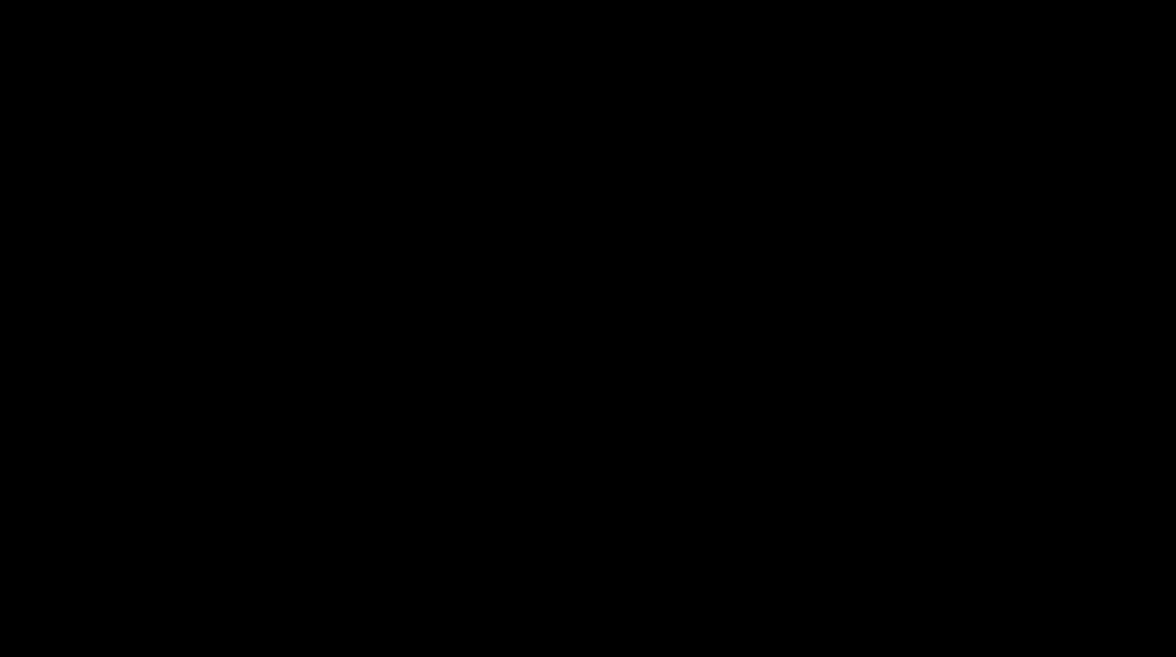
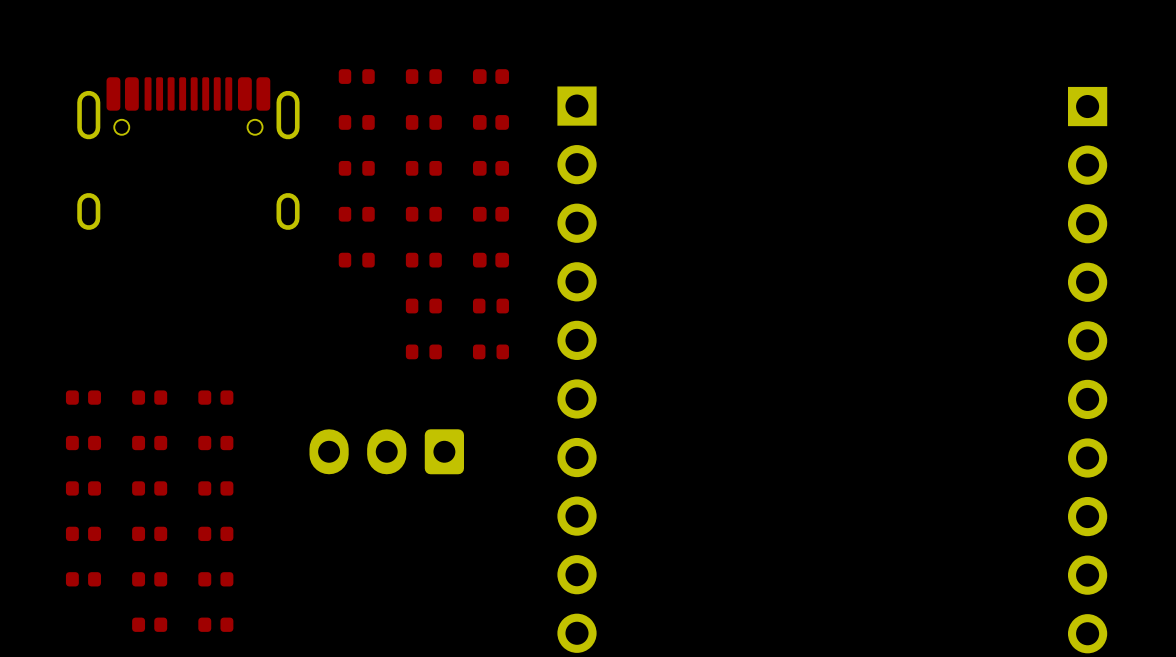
part: none -> (356, 76)
part: none -> (423, 76)
part: none -> (490, 76)
part: none -> (356, 122)
part: none -> (423, 122)
part: none -> (490, 122)
part: none -> (188, 153)
part: none -> (356, 168)
part: none -> (423, 168)
part: none -> (490, 168)
part: none -> (356, 214)
part: none -> (423, 214)
part: none -> (490, 214)
part: none -> (356, 260)
part: none -> (423, 260)
part: none -> (490, 260)
part: none -> (423, 306)
part: none -> (490, 306)
part: none -> (423, 351)
part: none -> (490, 351)
part: none -> (577, 369)
part: none -> (1087, 370)
part: none -> (83, 397)
part: none -> (149, 397)
part: none -> (215, 397)
part: none -> (83, 443)
part: none -> (149, 443)
part: none -> (215, 443)
part: none -> (386, 451)
part: none -> (83, 488)
part: none -> (149, 488)
part: none -> (215, 488)
part: none -> (83, 533)
part: none -> (149, 533)
part: none -> (215, 533)
part: none -> (83, 579)
part: none -> (149, 579)
part: none -> (215, 579)
part: none -> (149, 624)
part: none -> (215, 624)

